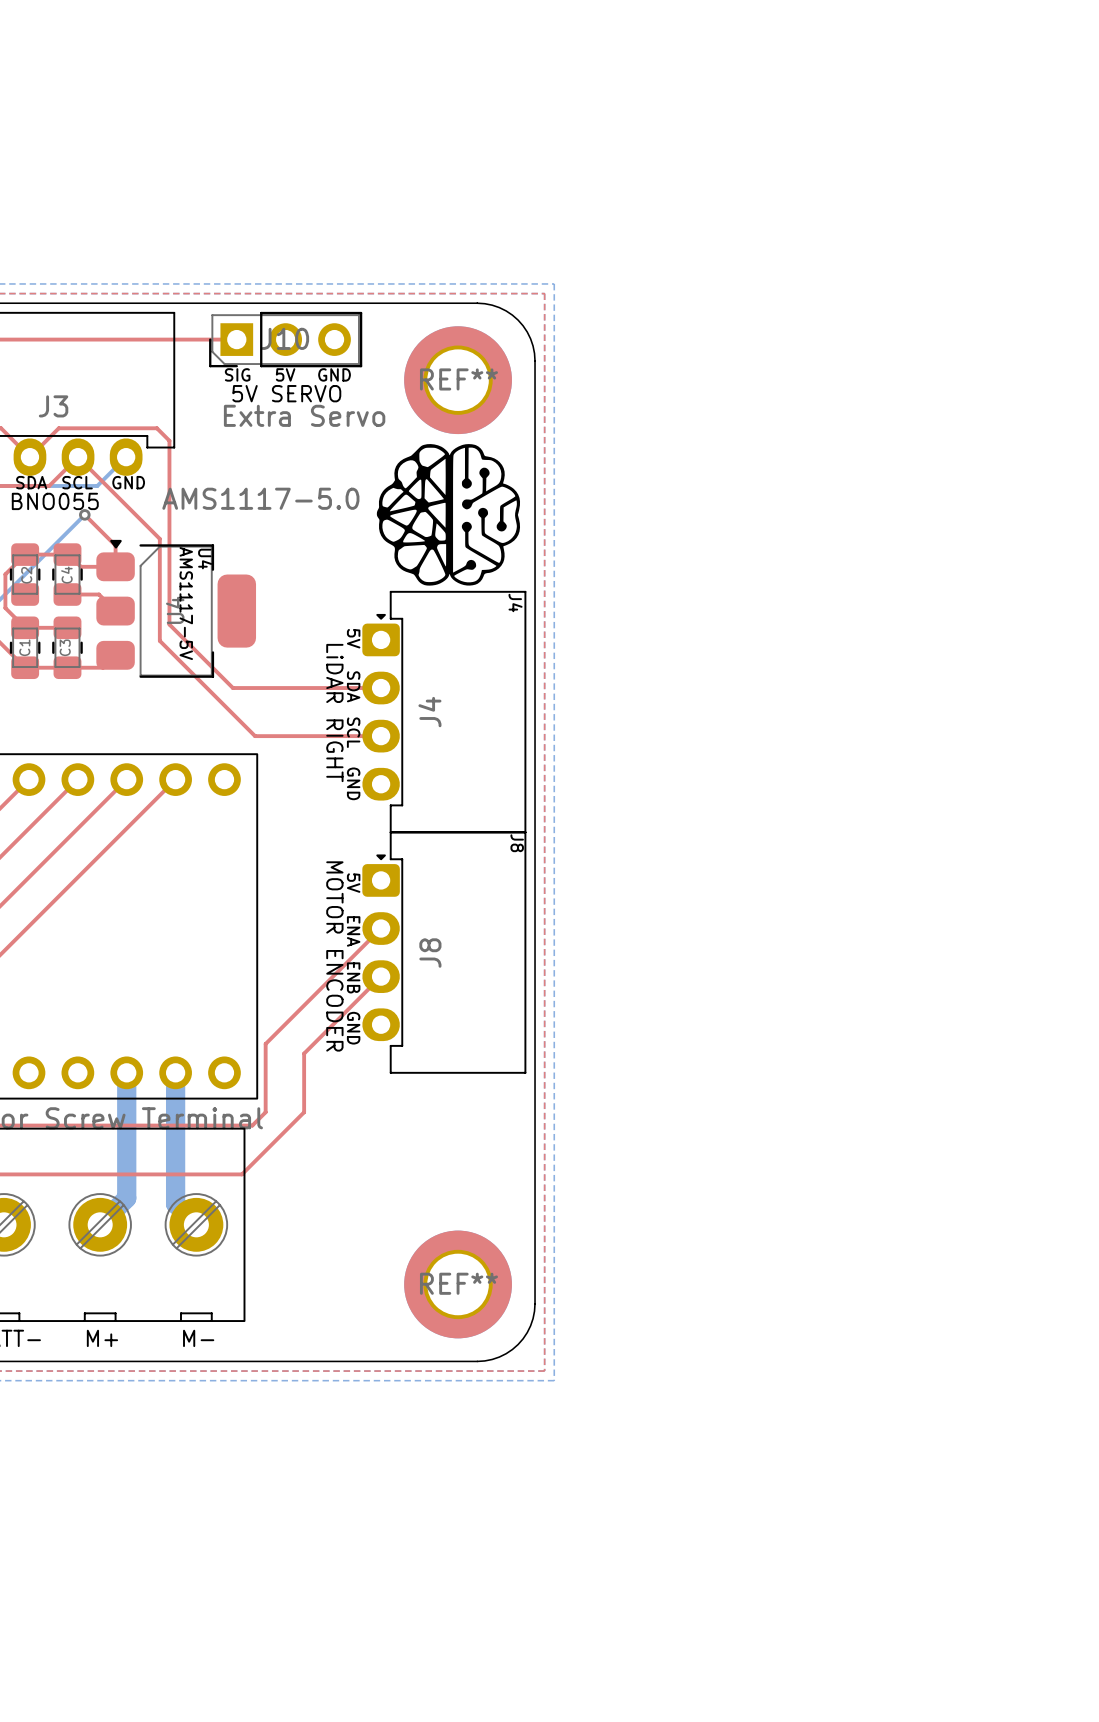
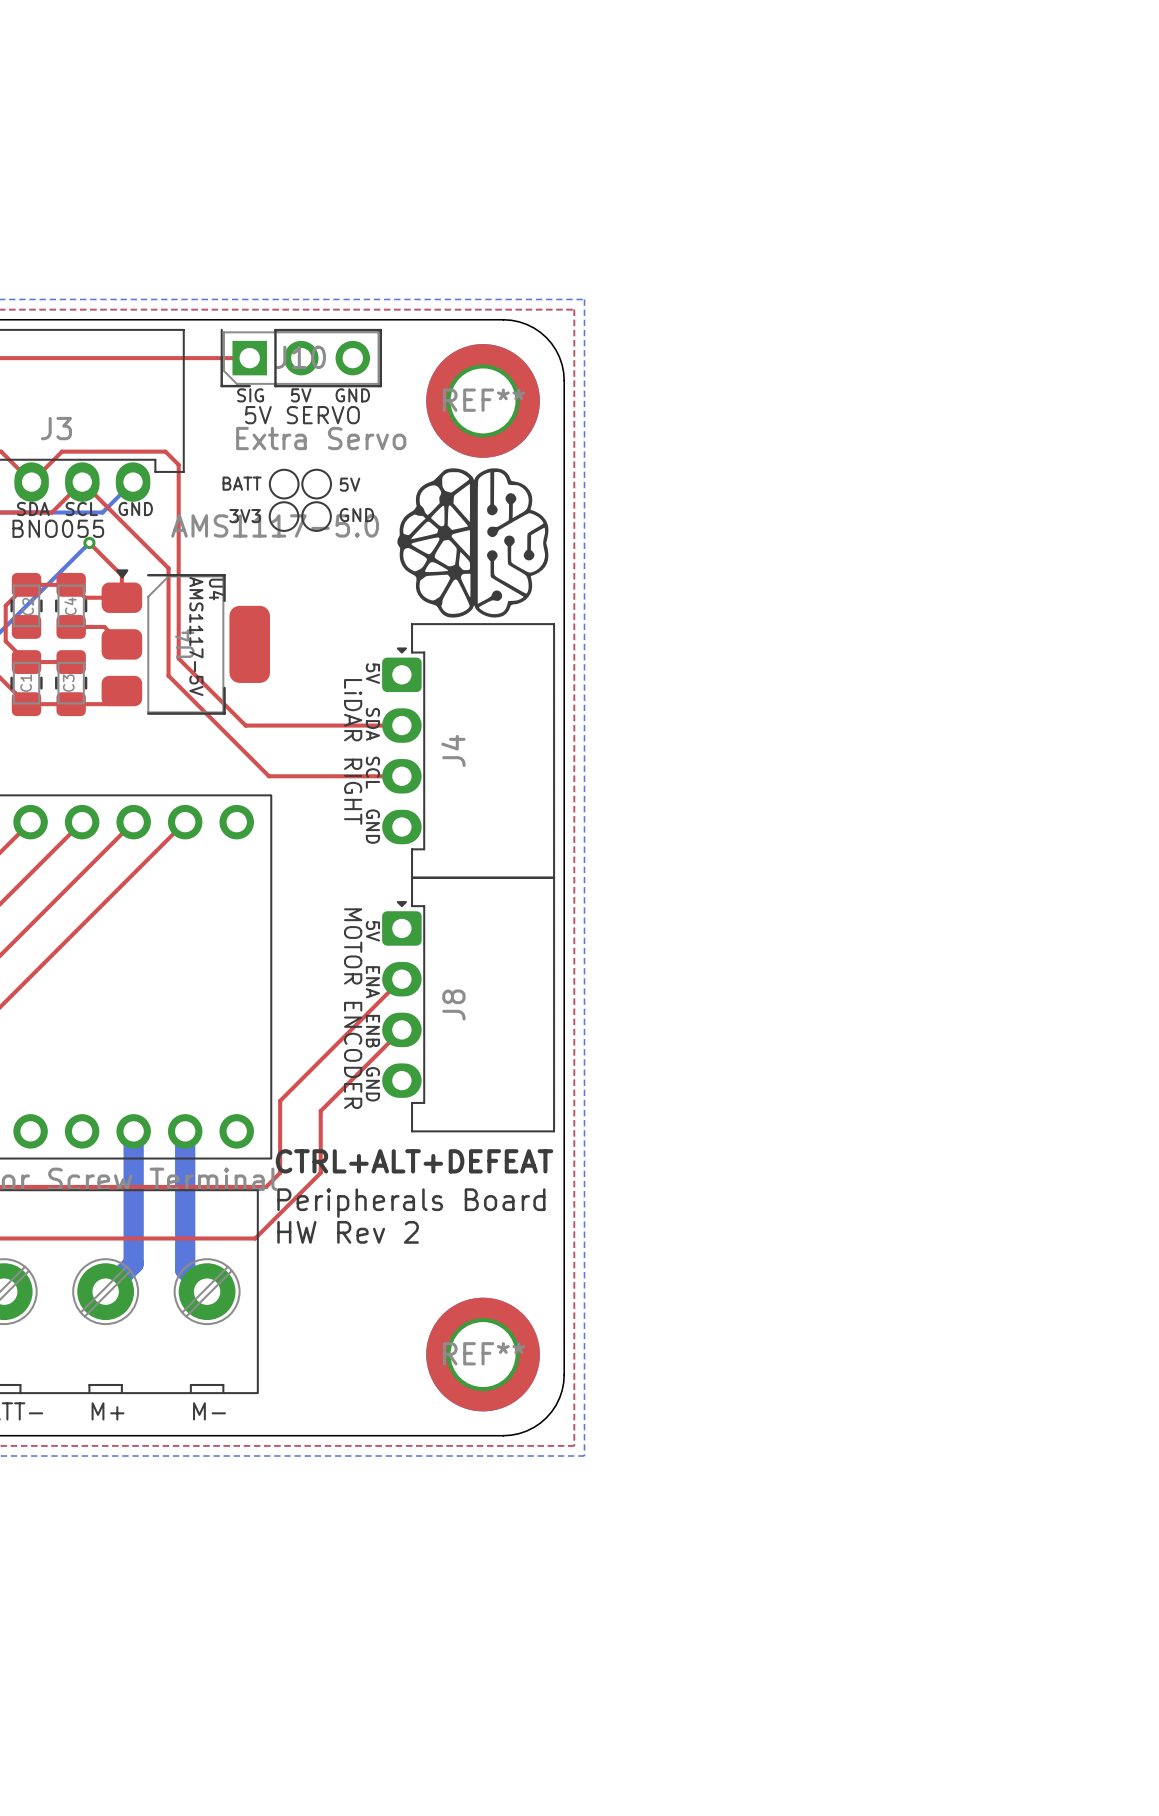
line: none -> (221, 329) (221, 358)
drawing: none -> [268, 468, 333, 532]
text: none -> BATT (242, 483)
text: none -> 5V (350, 484)
text: none -> GND (356, 515)
text: none -> 3V3 (245, 516)
text: J4 (515, 602) -> none
text: J8 (517, 843) -> none
text: none -> CTRL+ALT+DEFEAT (414, 1161)
text: none -> Peripherals Board (411, 1203)
text: none -> HW Rev 2 (348, 1232)

